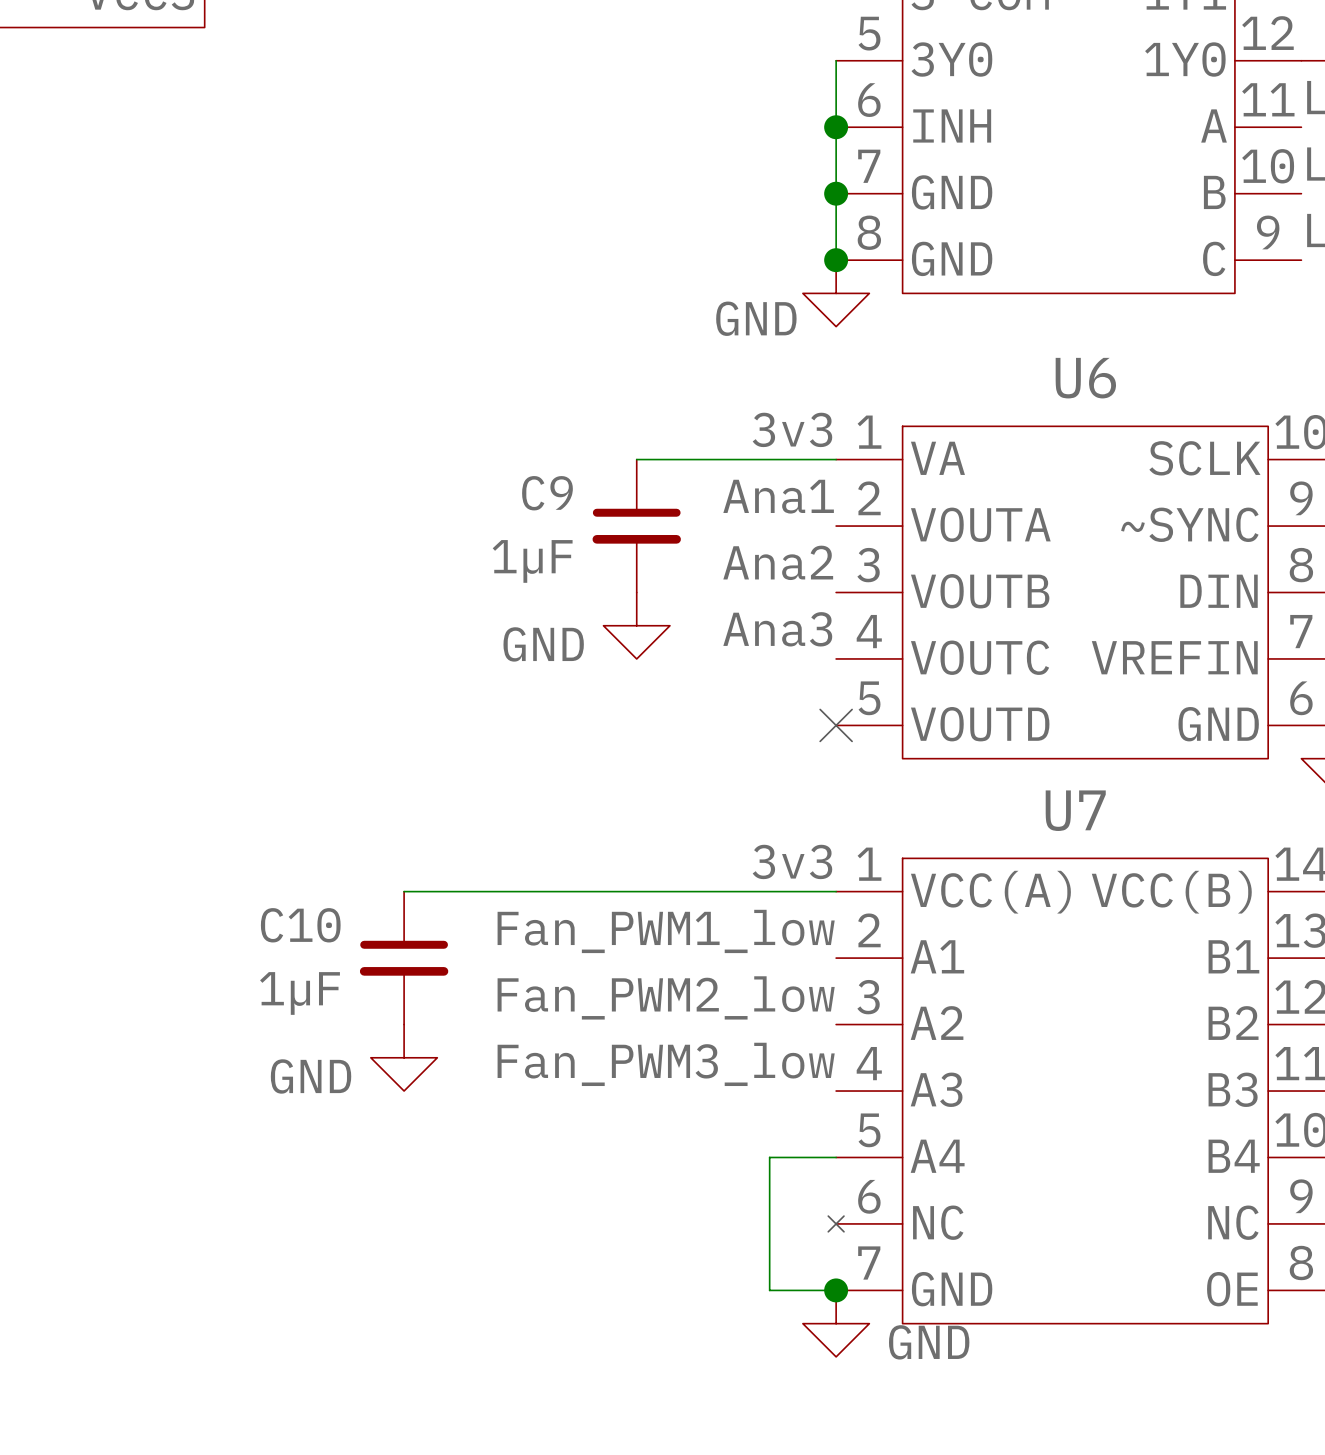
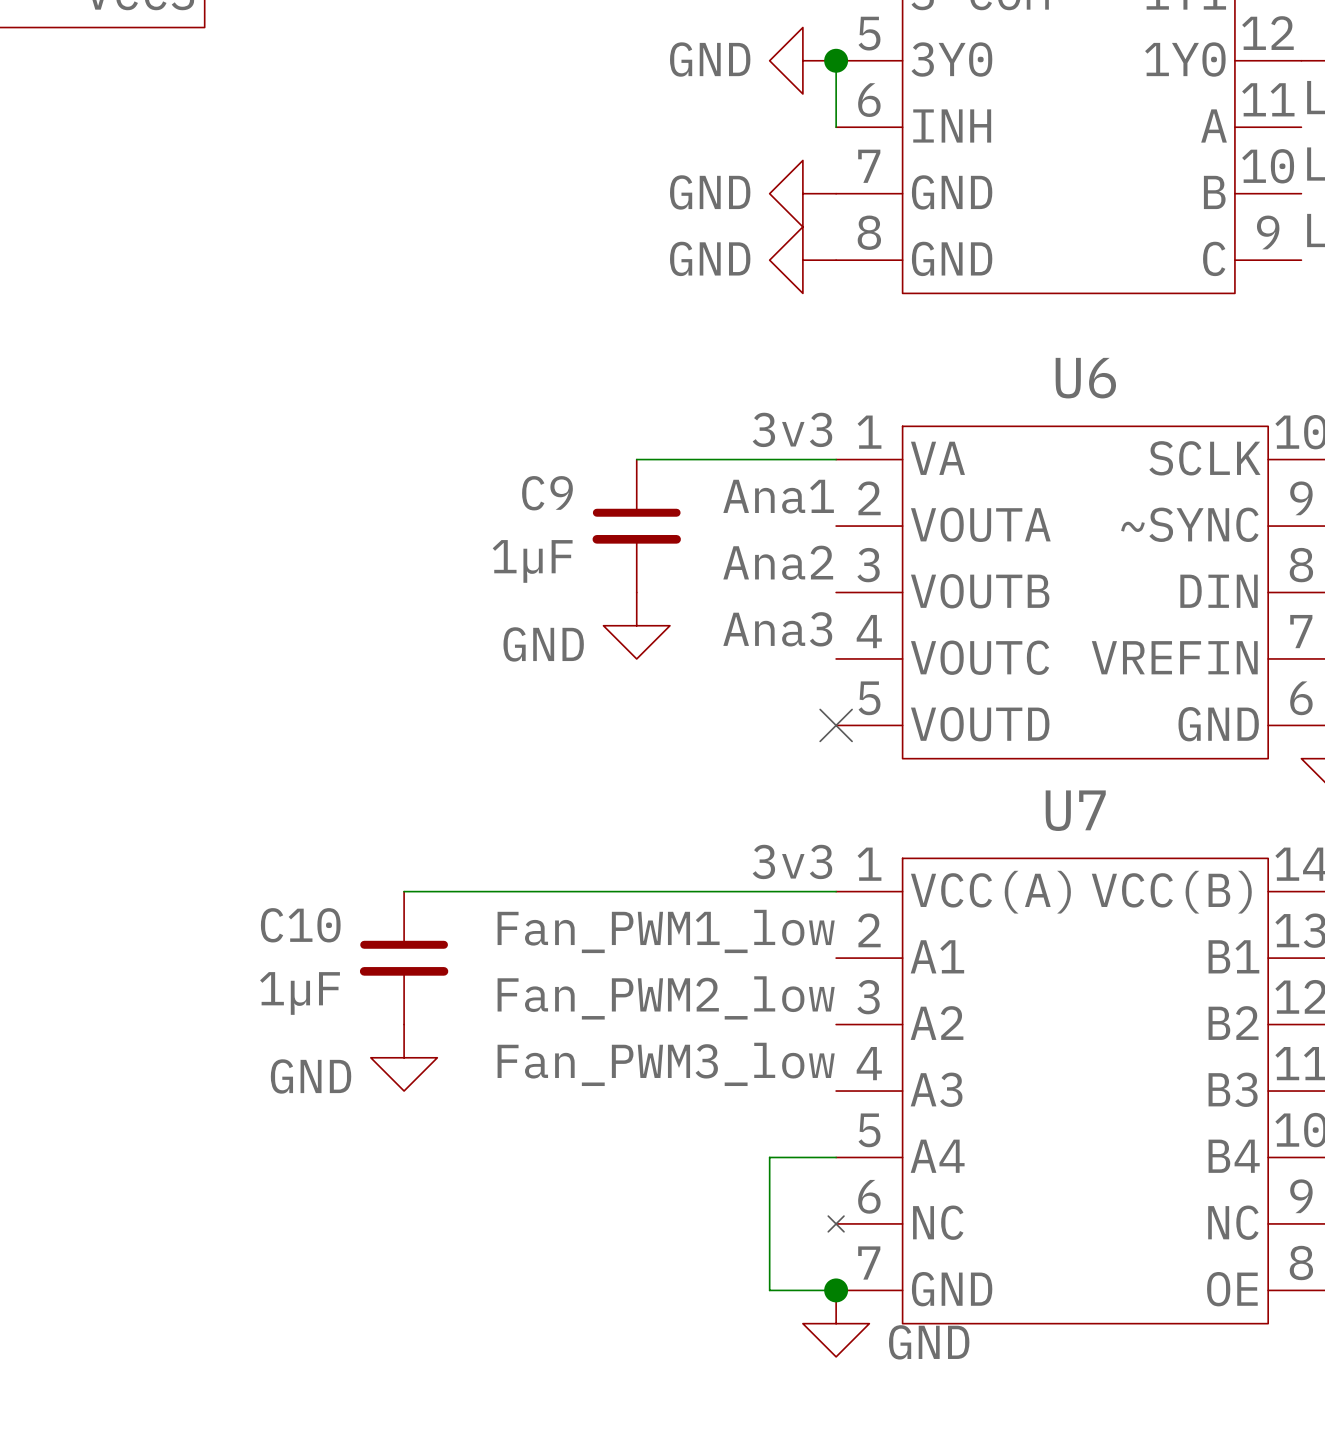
power symbol: none -> GND (802, 60)
junction: none -> (836, 60)
wire: (836, 127) (836, 260) -> none
junction: (836, 127) -> none
power symbol: none -> GND (802, 193)
junction: (836, 193) -> none
junction: (836, 260) -> none
power symbol rotation: 0° (836, 293) -> 90° clockwise (802, 260)
power symbol position: GND (836, 293) -> GND (802, 260)

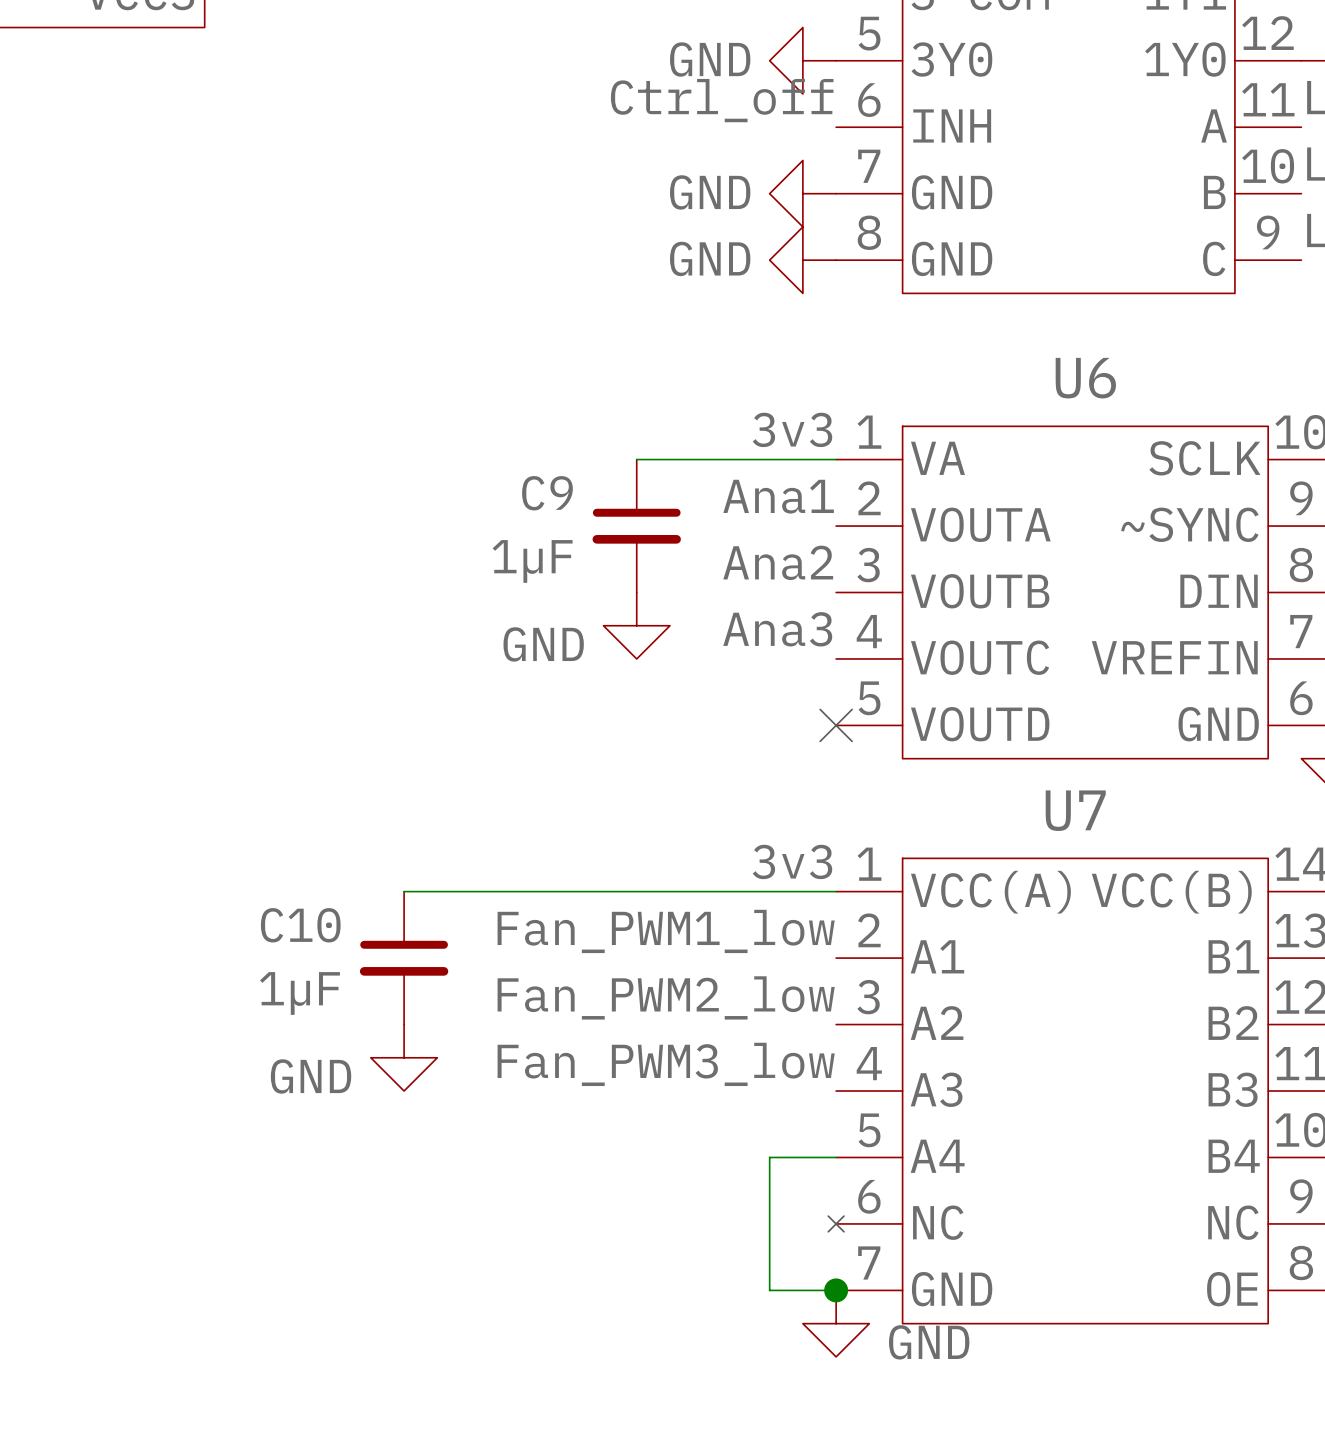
wire: (836, 60) (836, 127) -> none
junction: (836, 60) -> none
label: none -> Ctrl_off (722, 100)

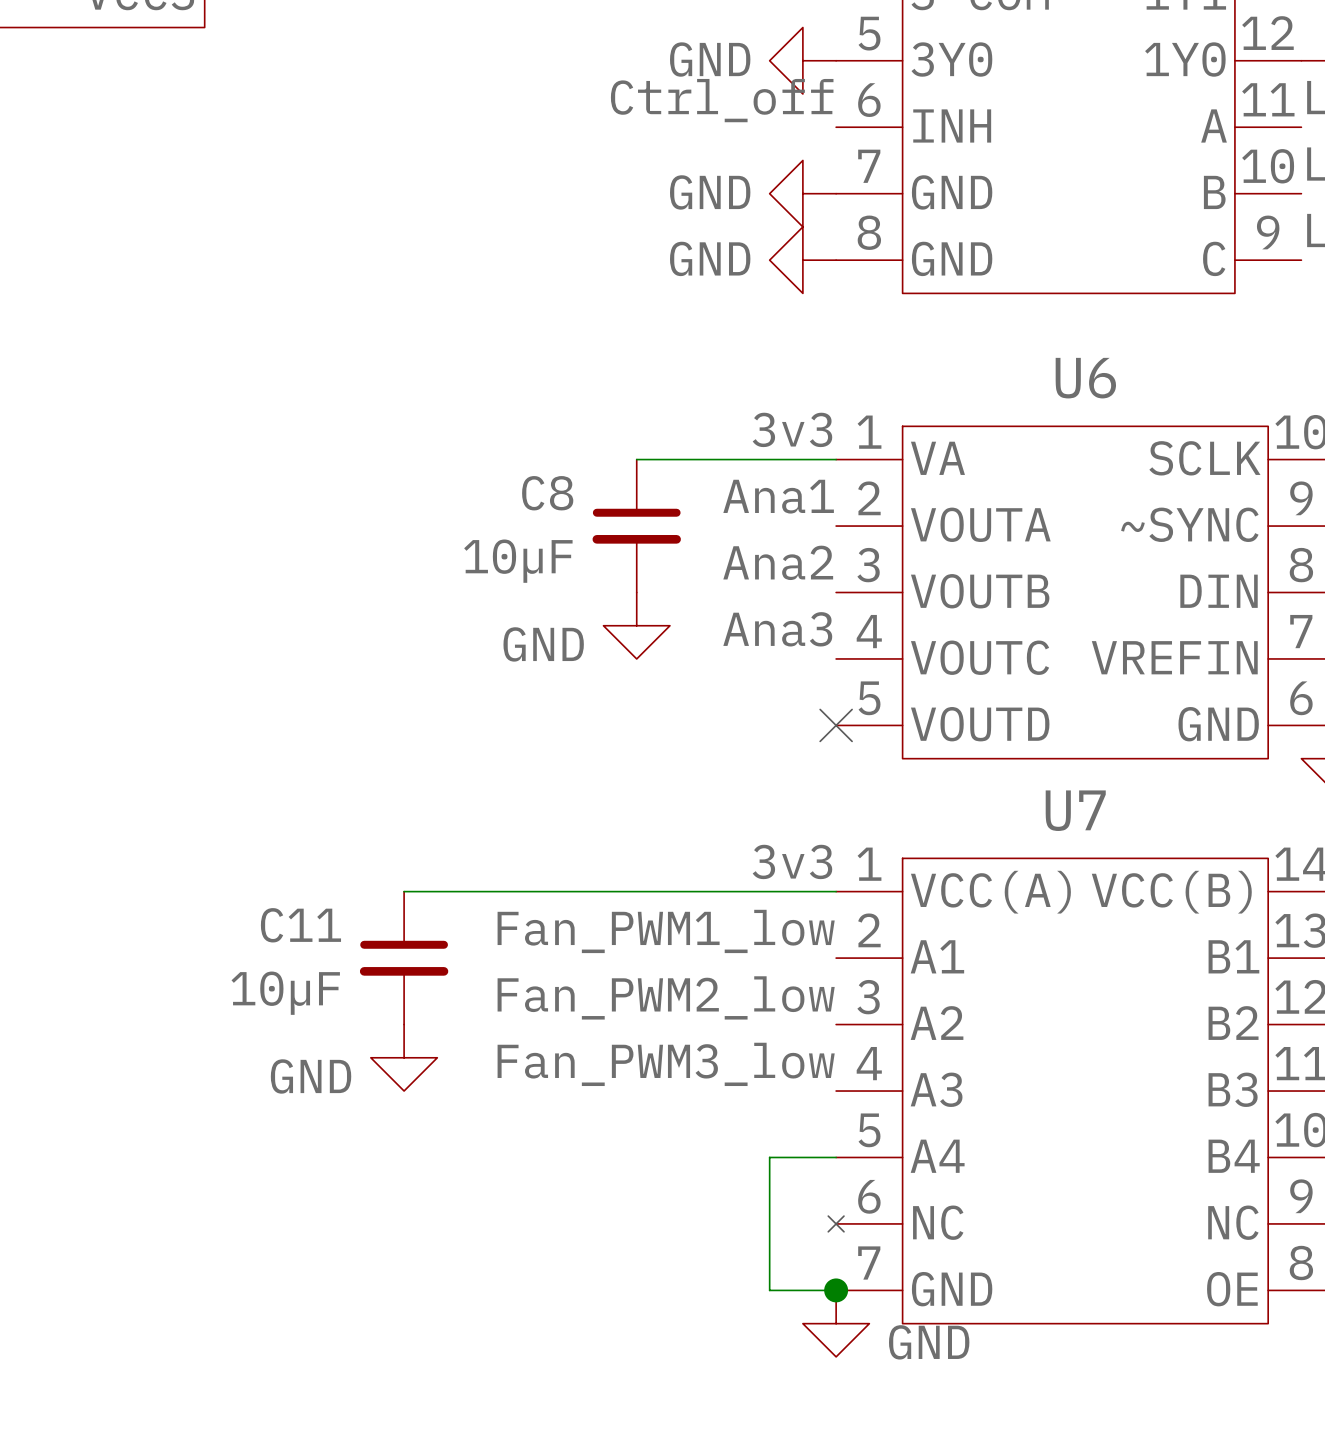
C9 name: C9 (547, 493) -> C8 (547, 493)
C9 value: 1µF (532, 561) -> 10µF (518, 561)
C10 name: C10 (300, 925) -> C11 (300, 925)
C10 value: 1µF (300, 993) -> 10µF (285, 993)

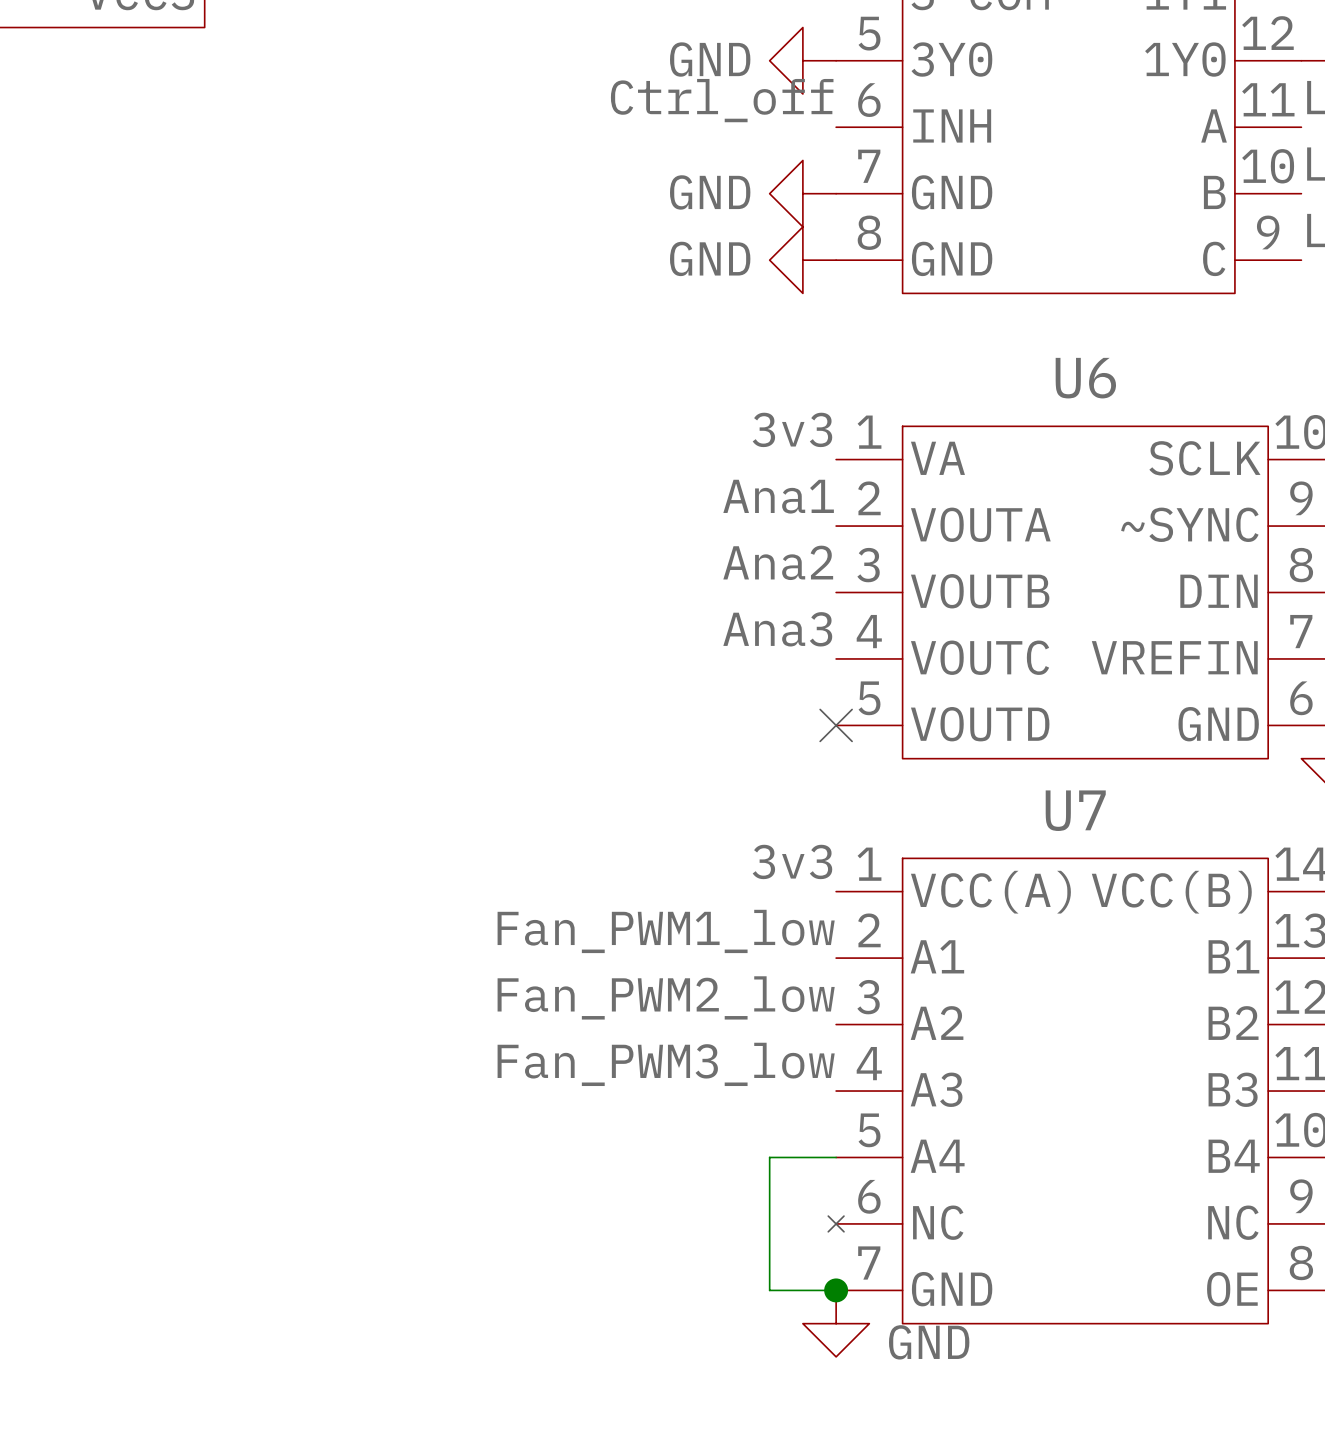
wire: (636, 459) (836, 459) -> none
C8: 10µF (636, 526) -> none
power symbol: GND (636, 625) -> none
wire: (404, 891) (836, 891) -> none
C11: 10µF (404, 958) -> none
power symbol: GND (404, 1057) -> none

